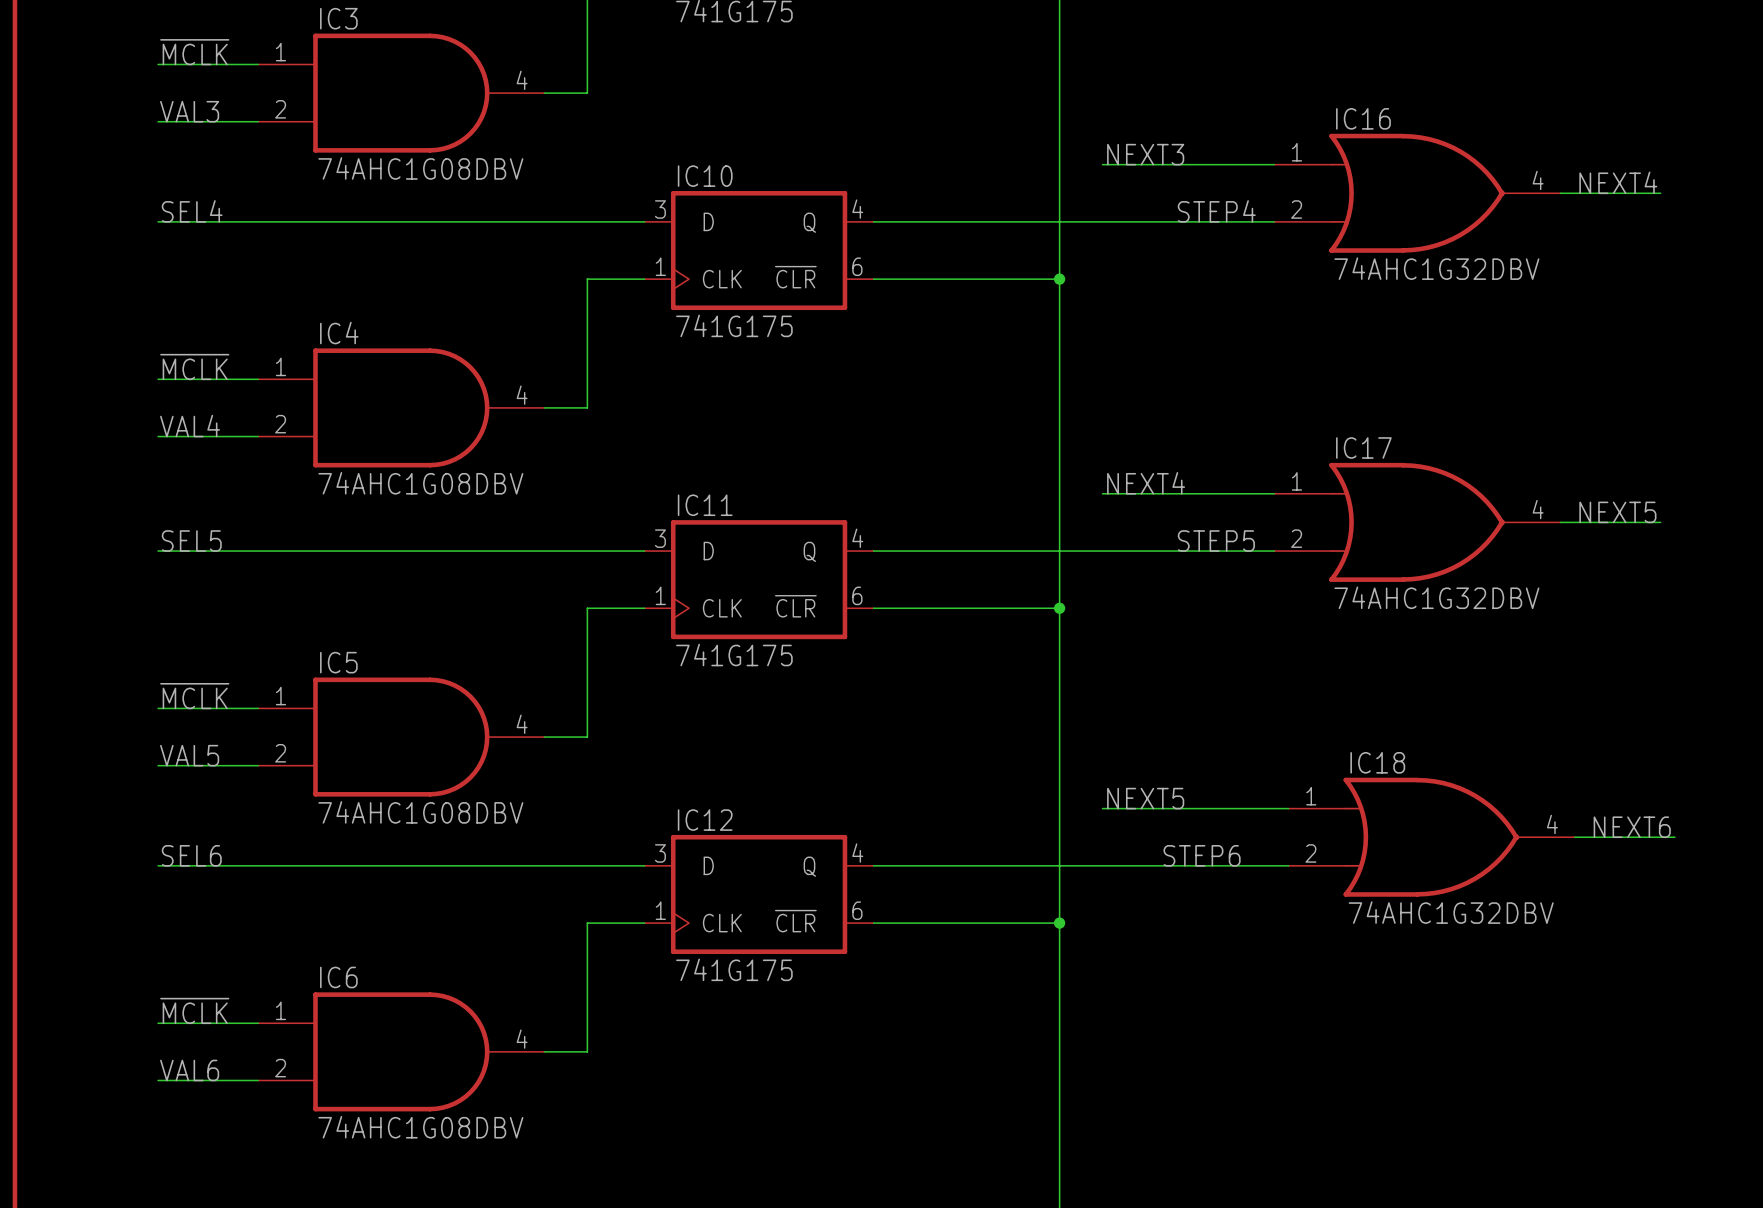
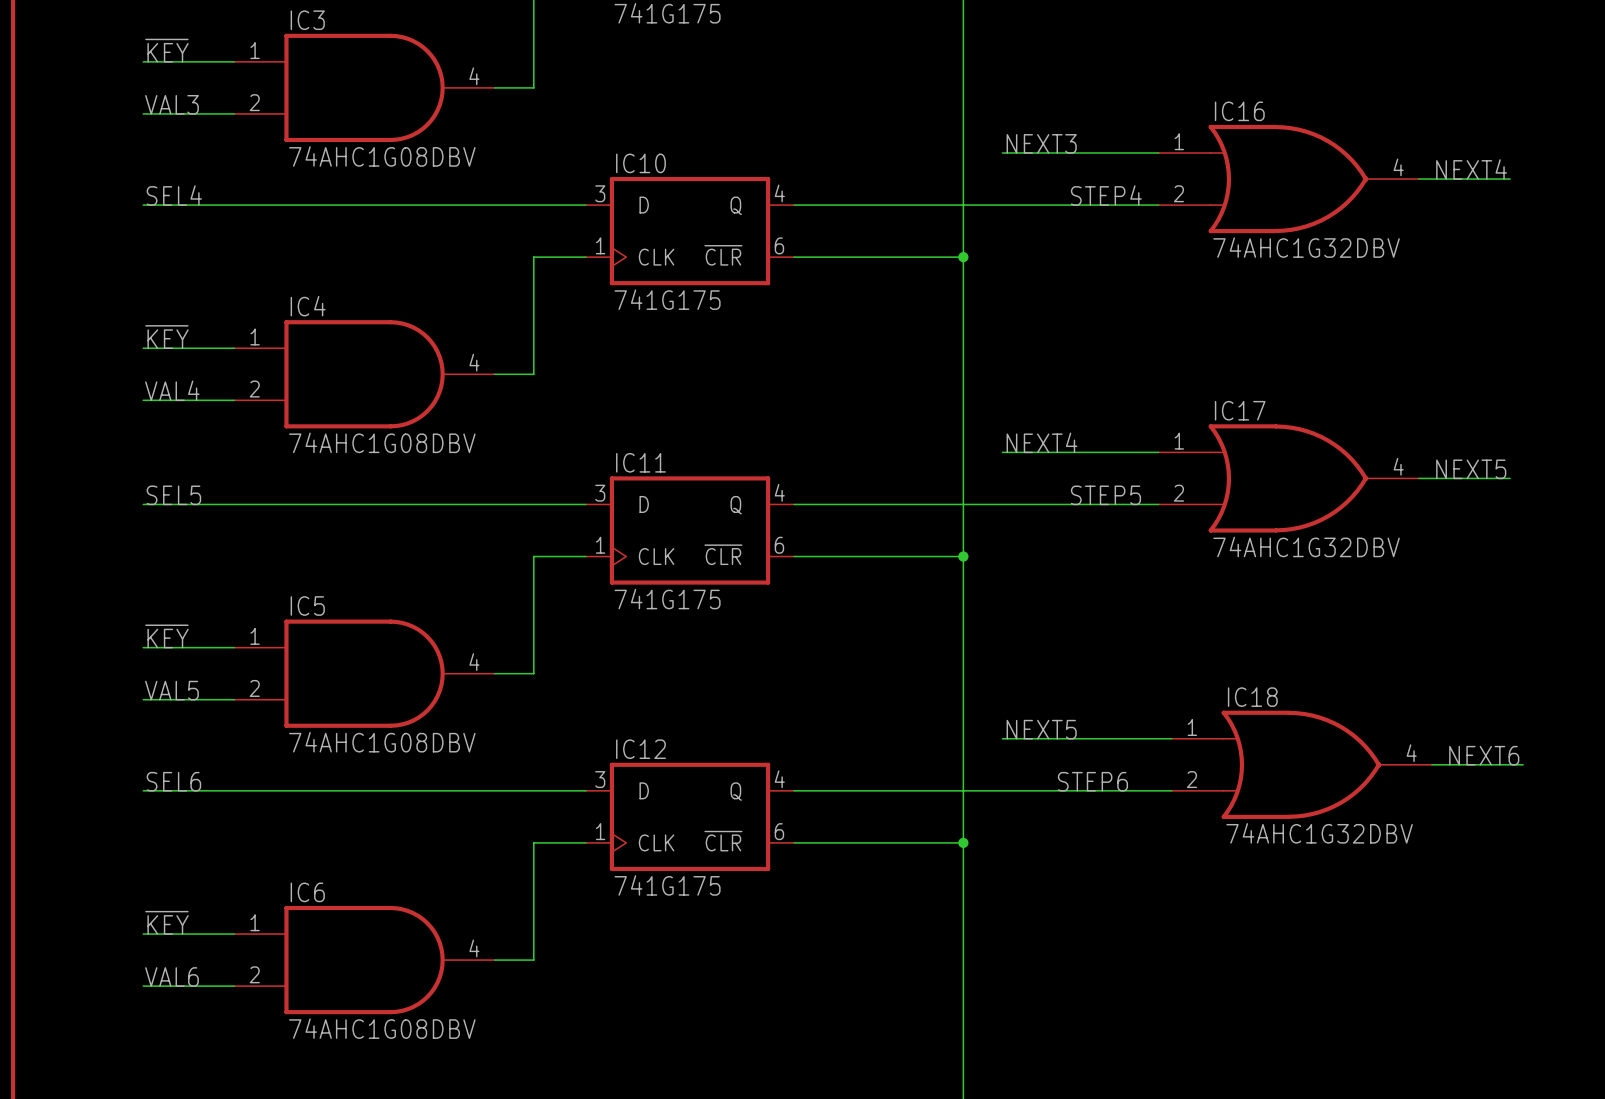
label: ~{MCLK} (194, 52) -> ~{KEY} (166, 50)
label: ~{MCLK} (194, 366) -> ~{KEY} (166, 337)
label: ~{MCLK} (194, 696) -> ~{KEY} (166, 636)
label: ~{MCLK} (194, 1010) -> ~{KEY} (166, 922)

